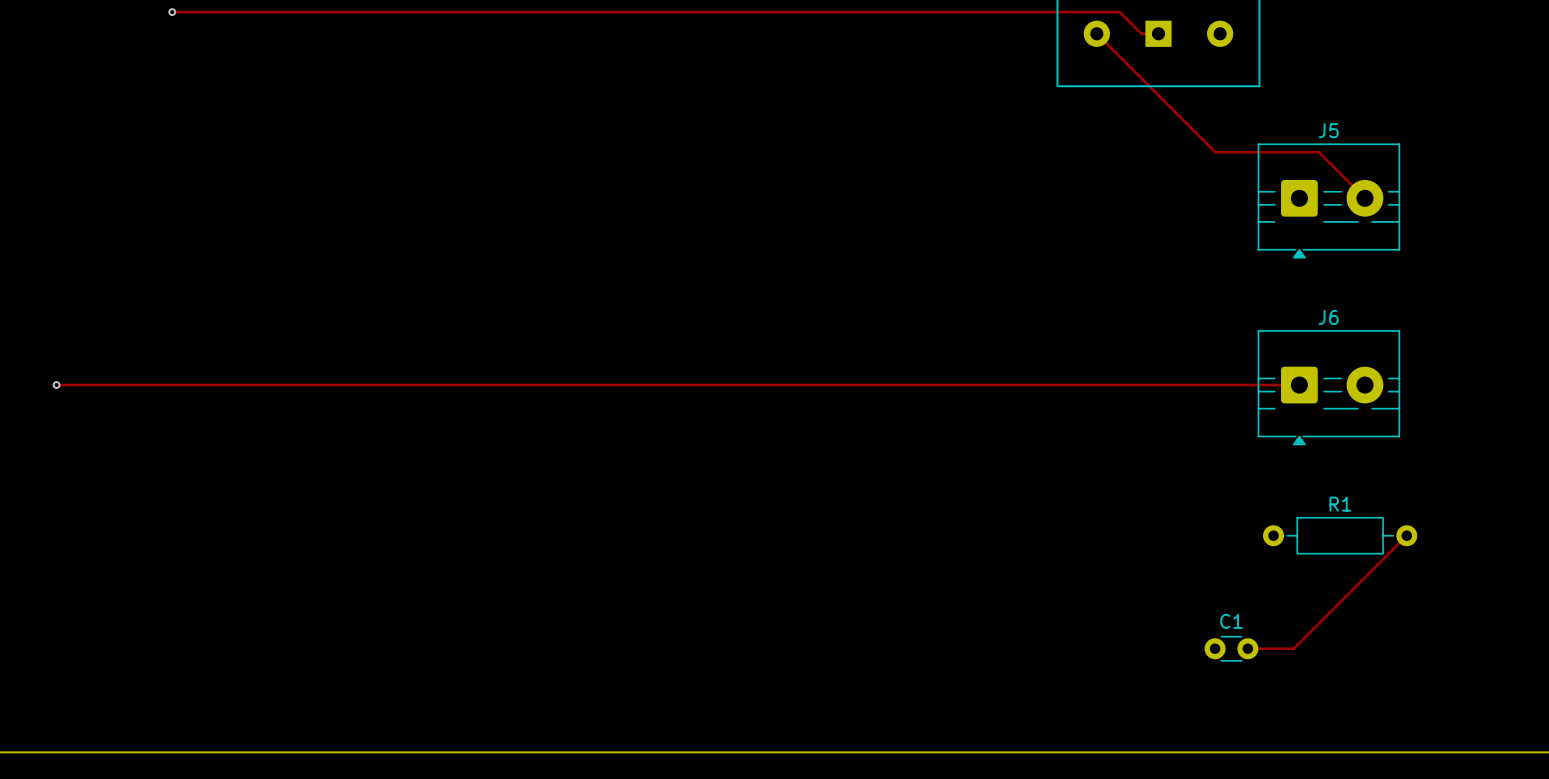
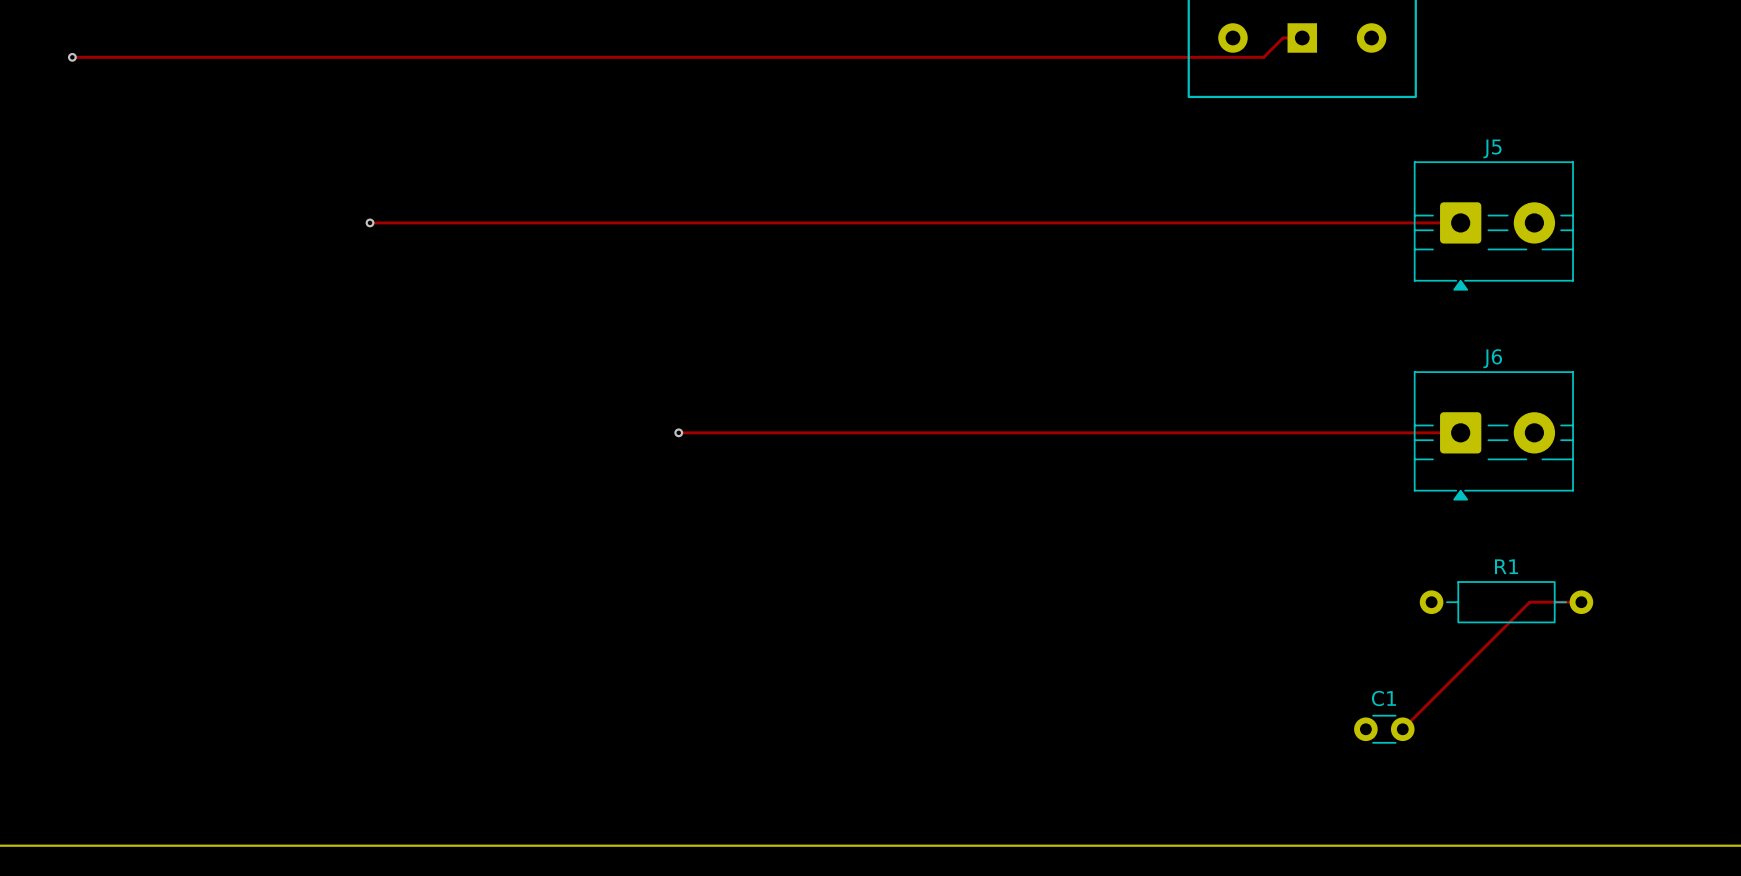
track: (172, 12) (1119, 12) (1141, 33) -> (72, 57) (1263, 57) (1283, 37)
via: (172, 12) -> none
track: (1096, 33) (1215, 152) (1318, 152) (1364, 198) -> none
via: none -> (72, 57)
track: none -> (370, 222) (1460, 222)
via: none -> (370, 222)
track: (56, 385) (603, 385) -> none
via: (56, 385) -> none
via: none -> (678, 432)
track: (1406, 535) (1293, 648) (1247, 648) -> (1581, 602) (1529, 602) (1402, 729)

